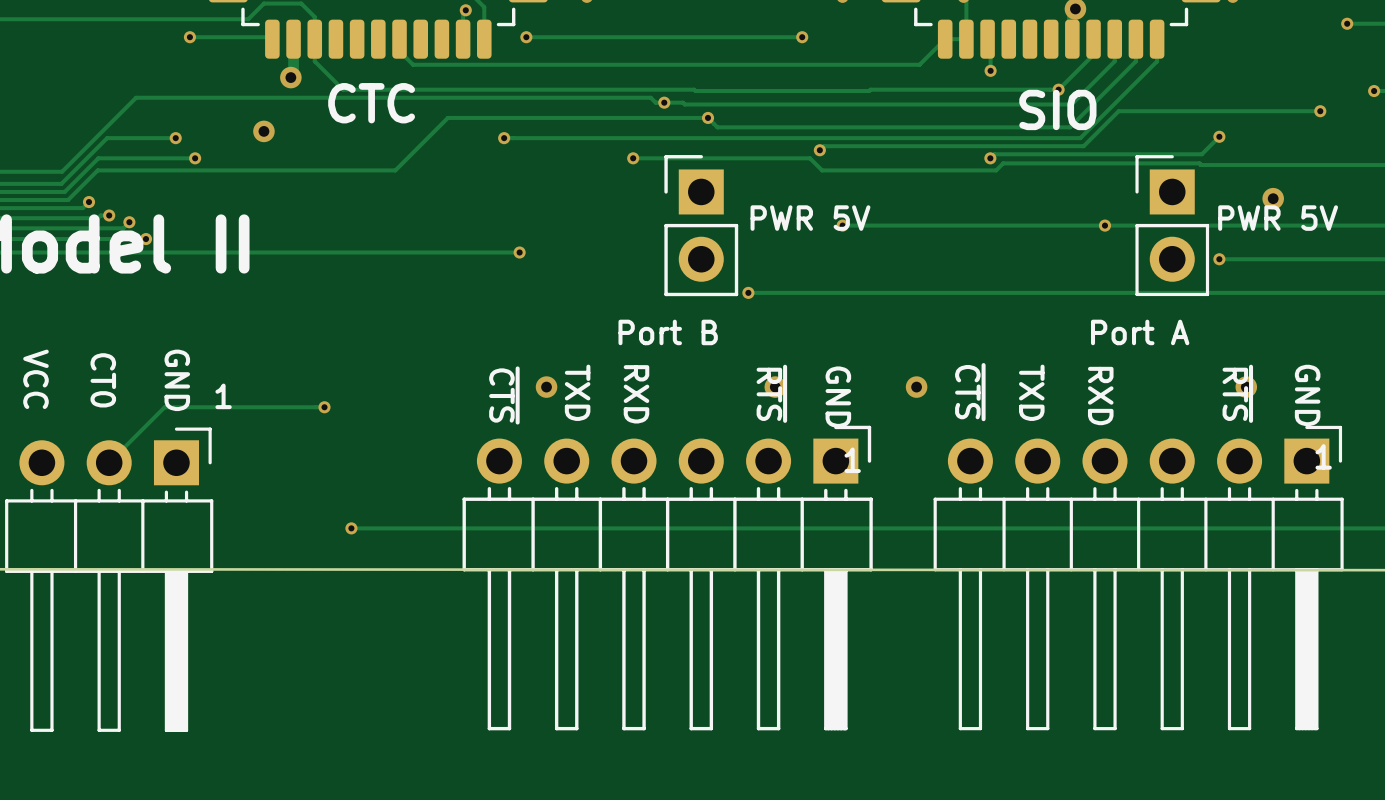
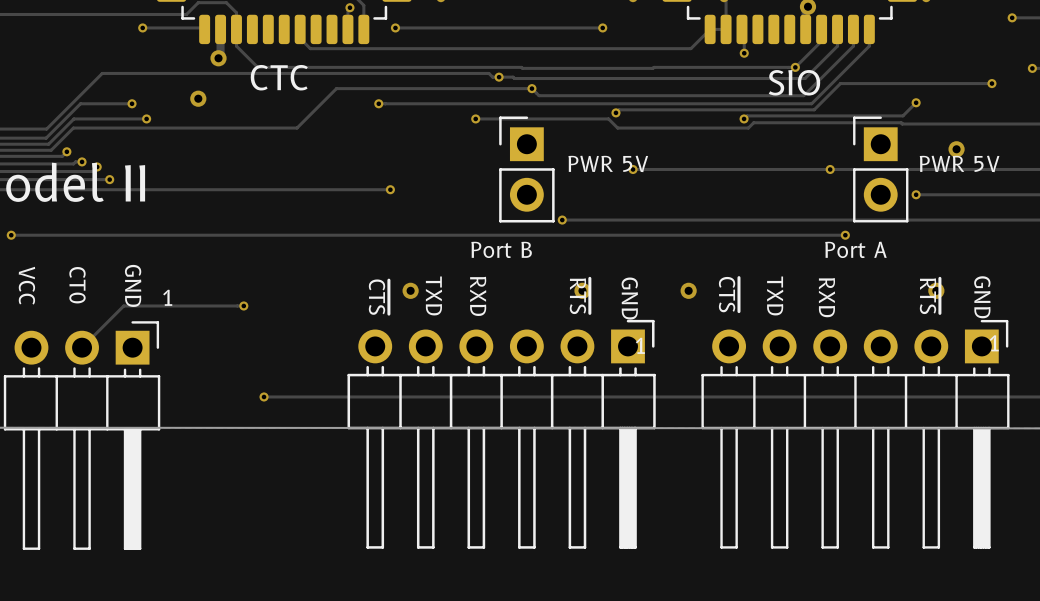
track: none -> (11, 235) (845, 235)
via: none -> (11, 235)
via: none -> (845, 235)

